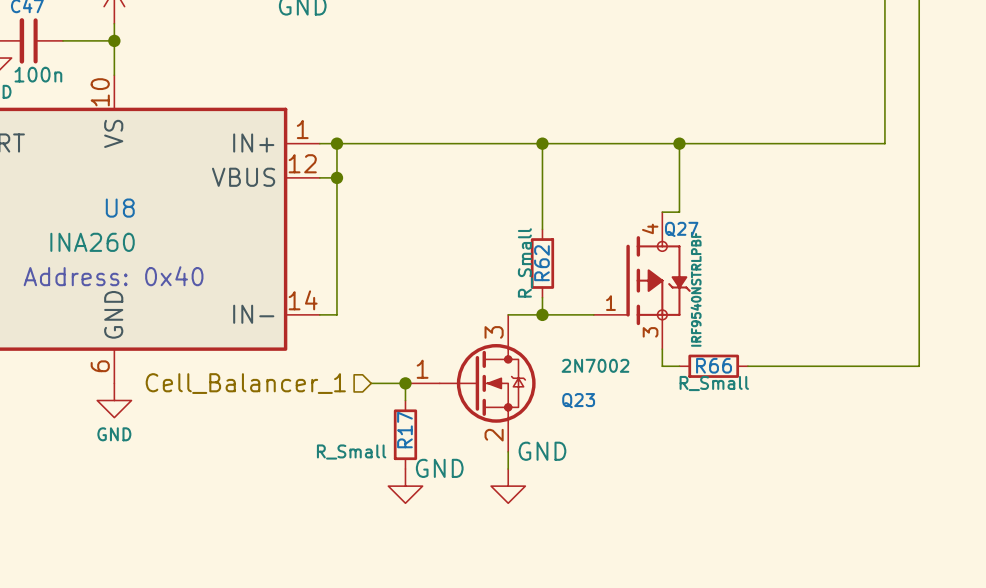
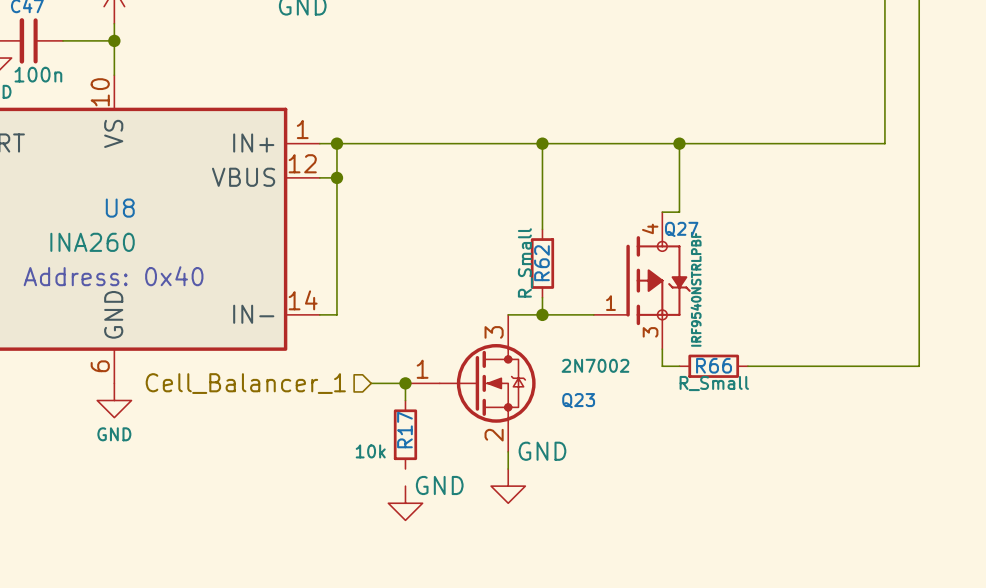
R17 value: R_Small (351, 452) -> 10k (370, 451)
power symbol position: GND (405, 486) -> GND (405, 503)

